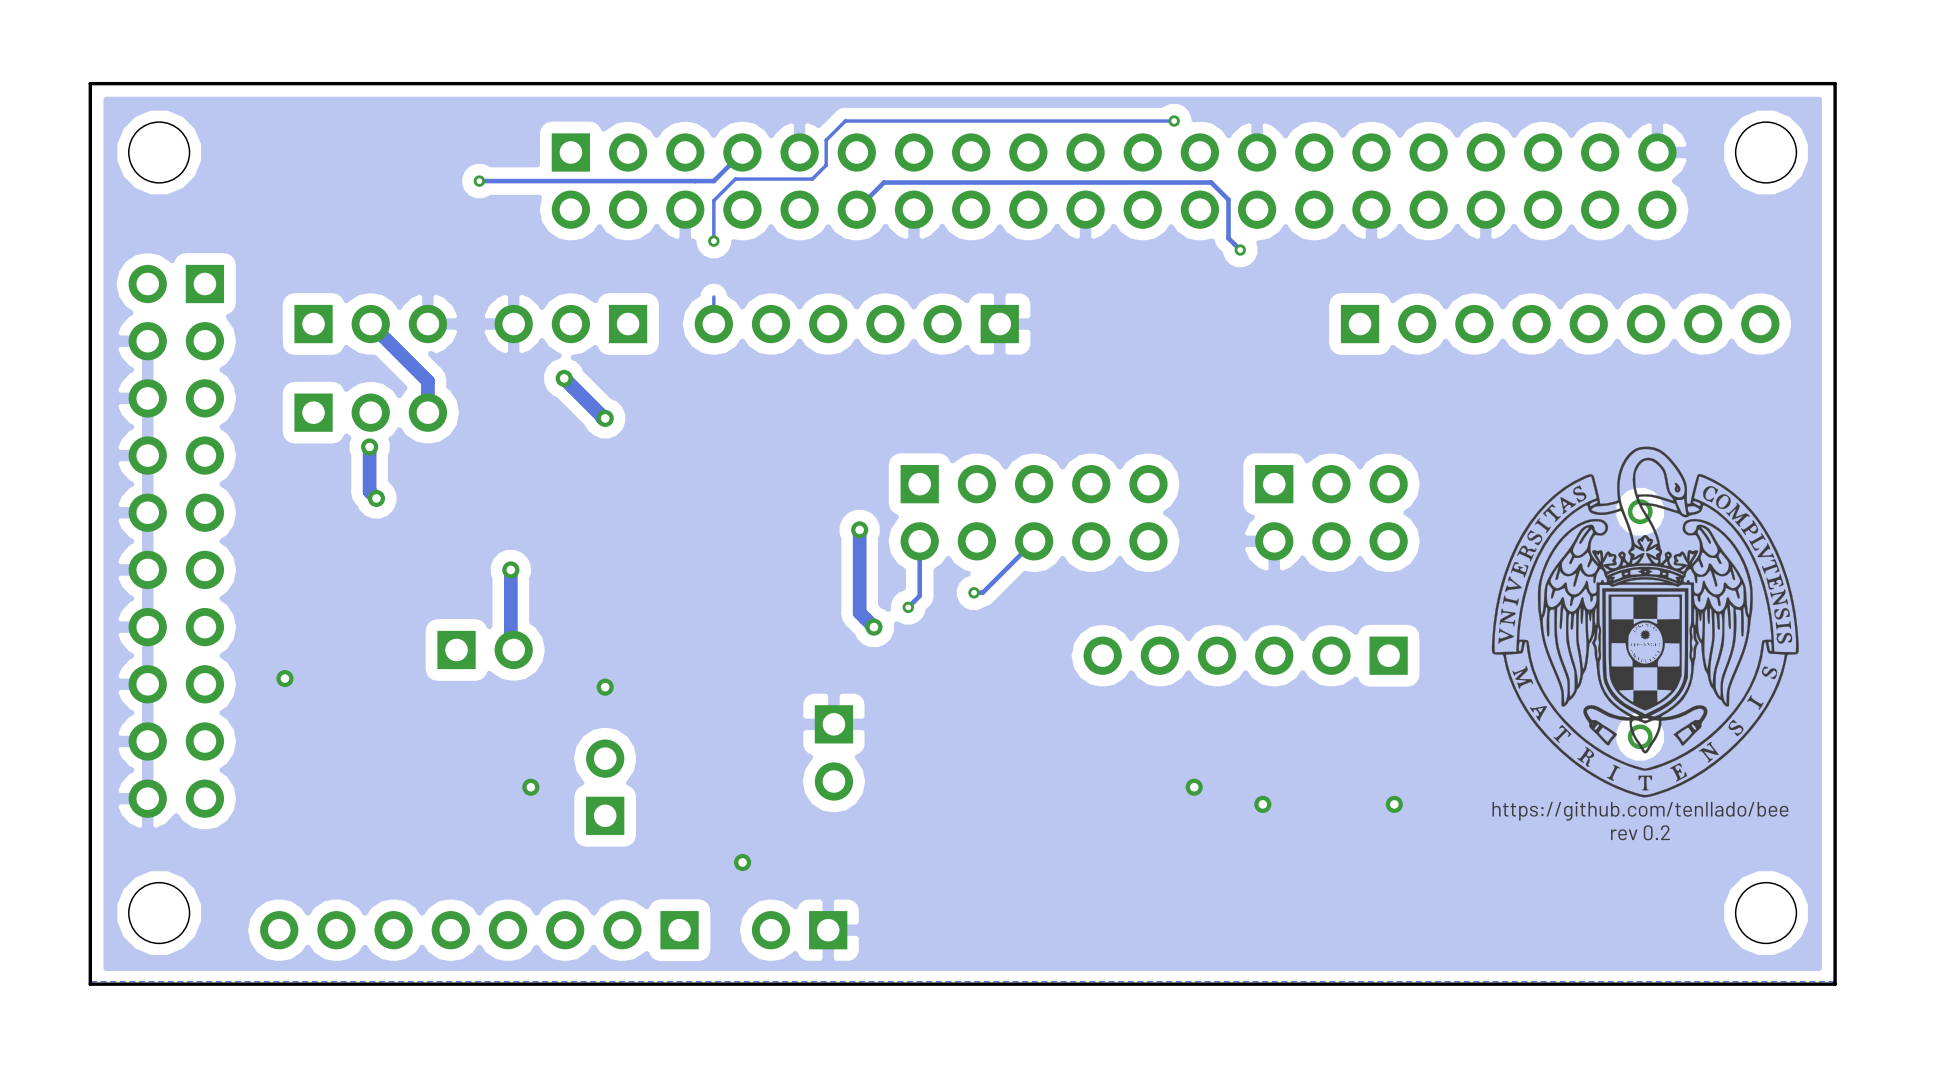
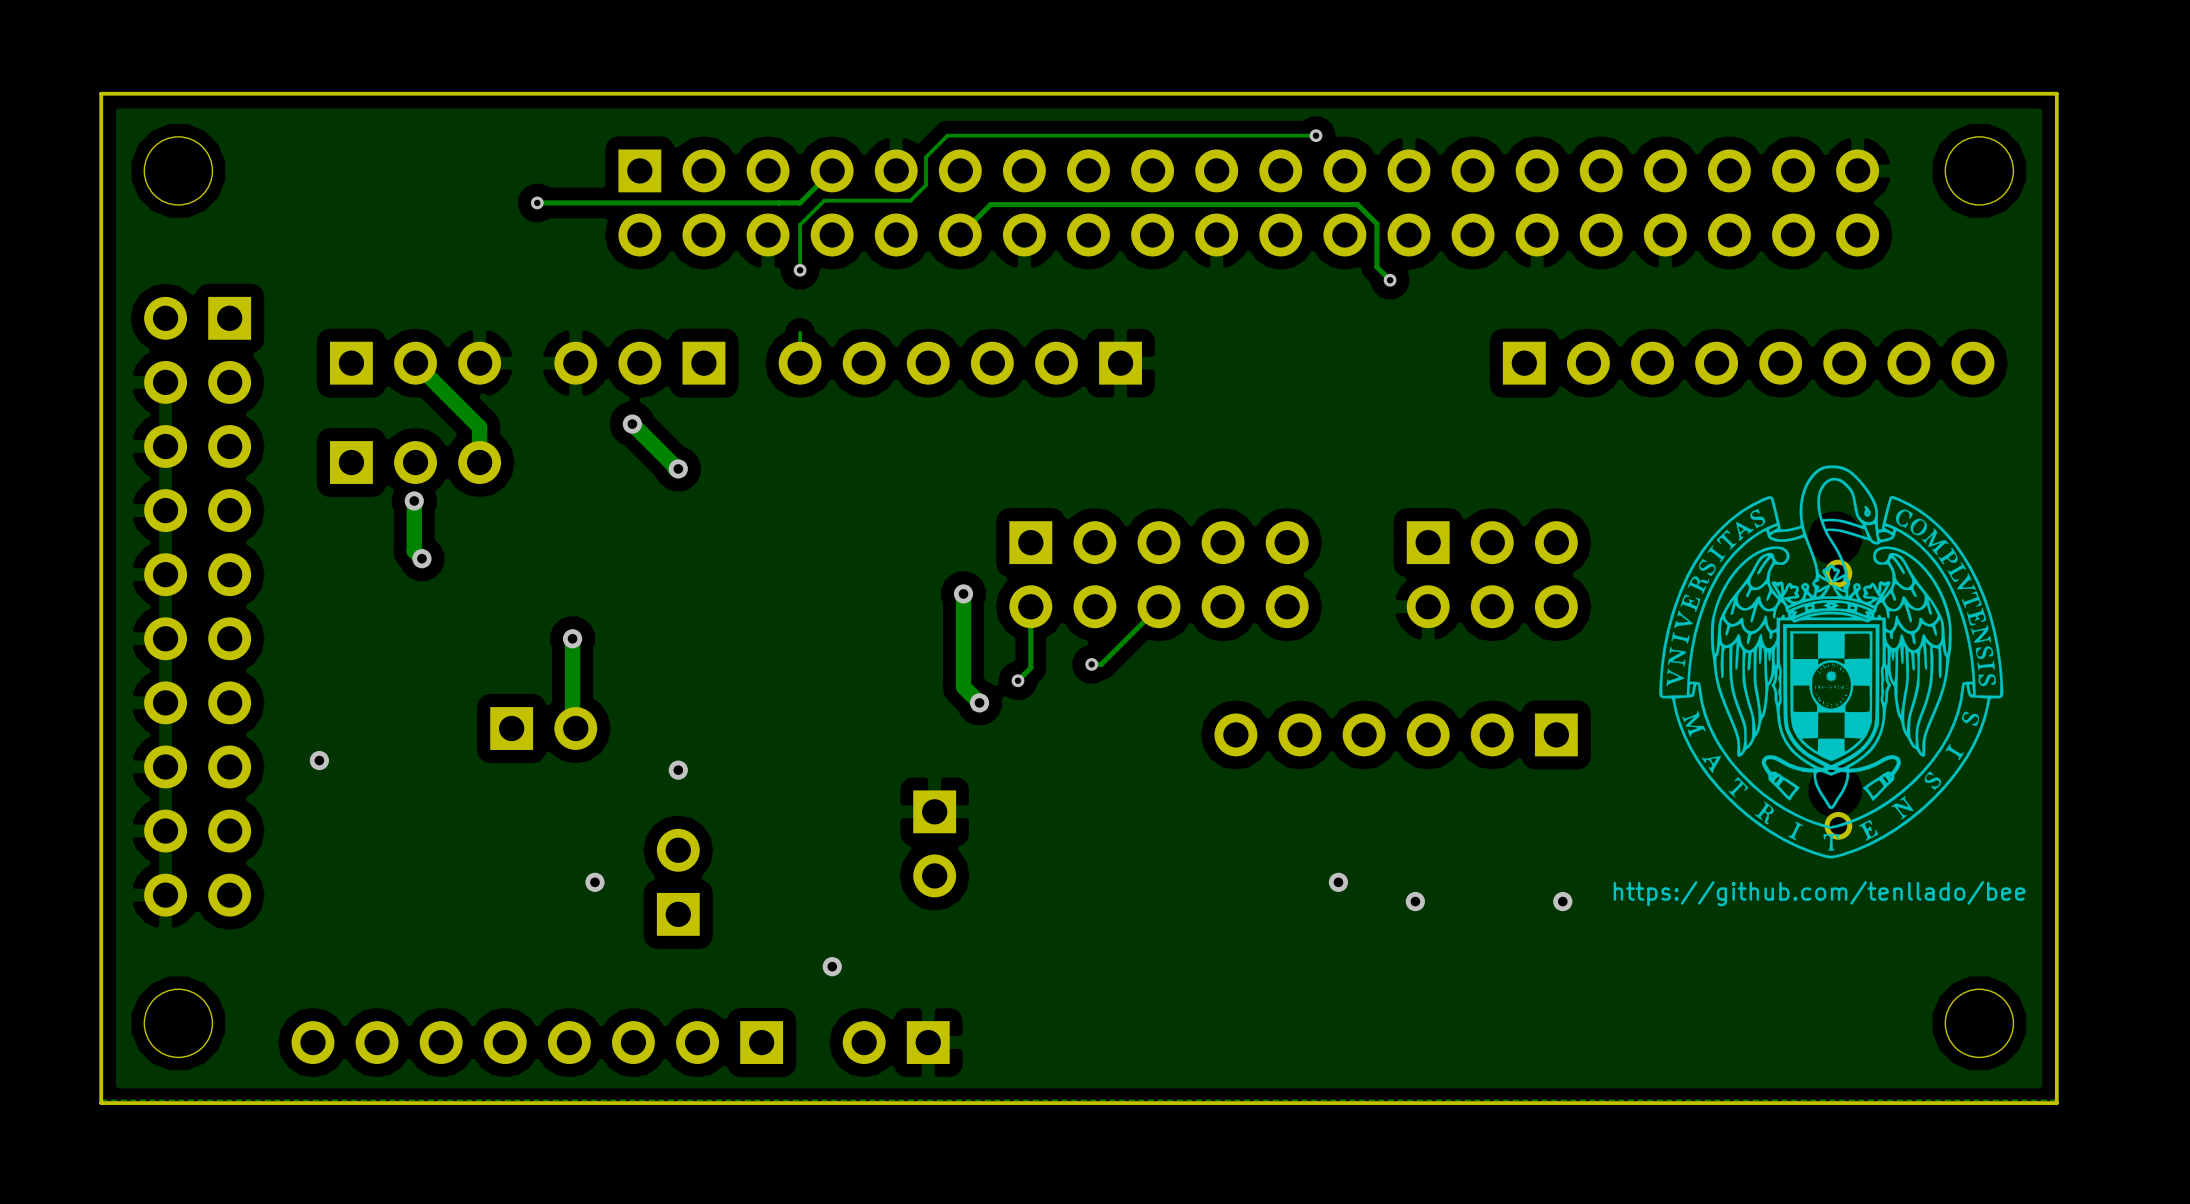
drawing position: (1645, 622) -> (1831, 661)
text position: https://github.com/tenllado/bee (1640, 811) -> https://github.com/tenllado/bee (1819, 893)
text: rev 0.2 (1640, 832) -> none

